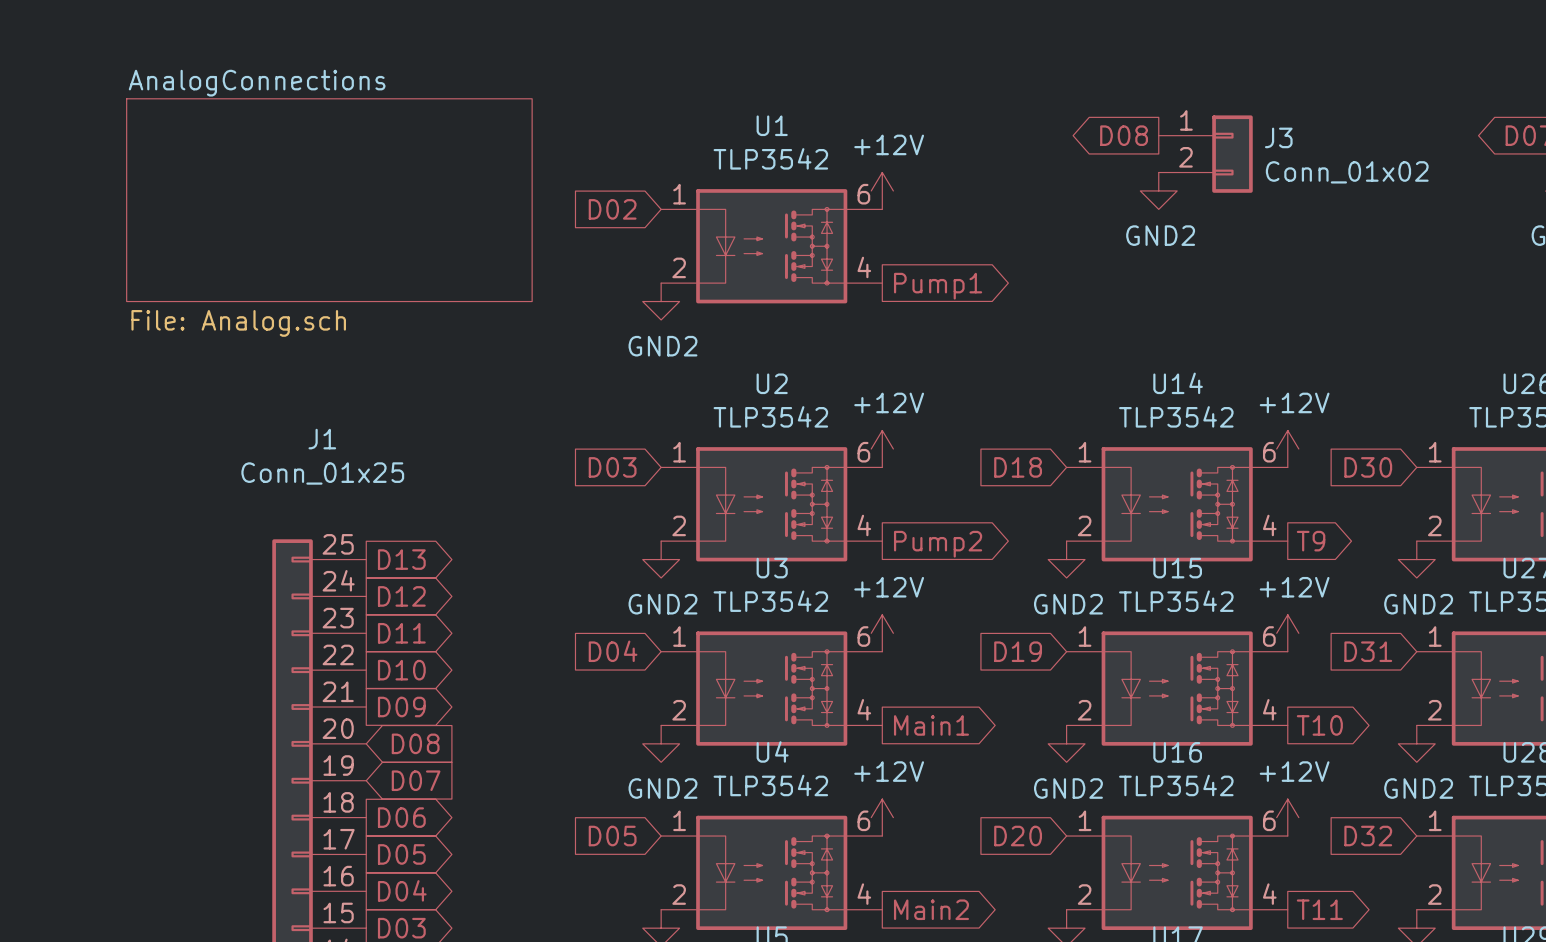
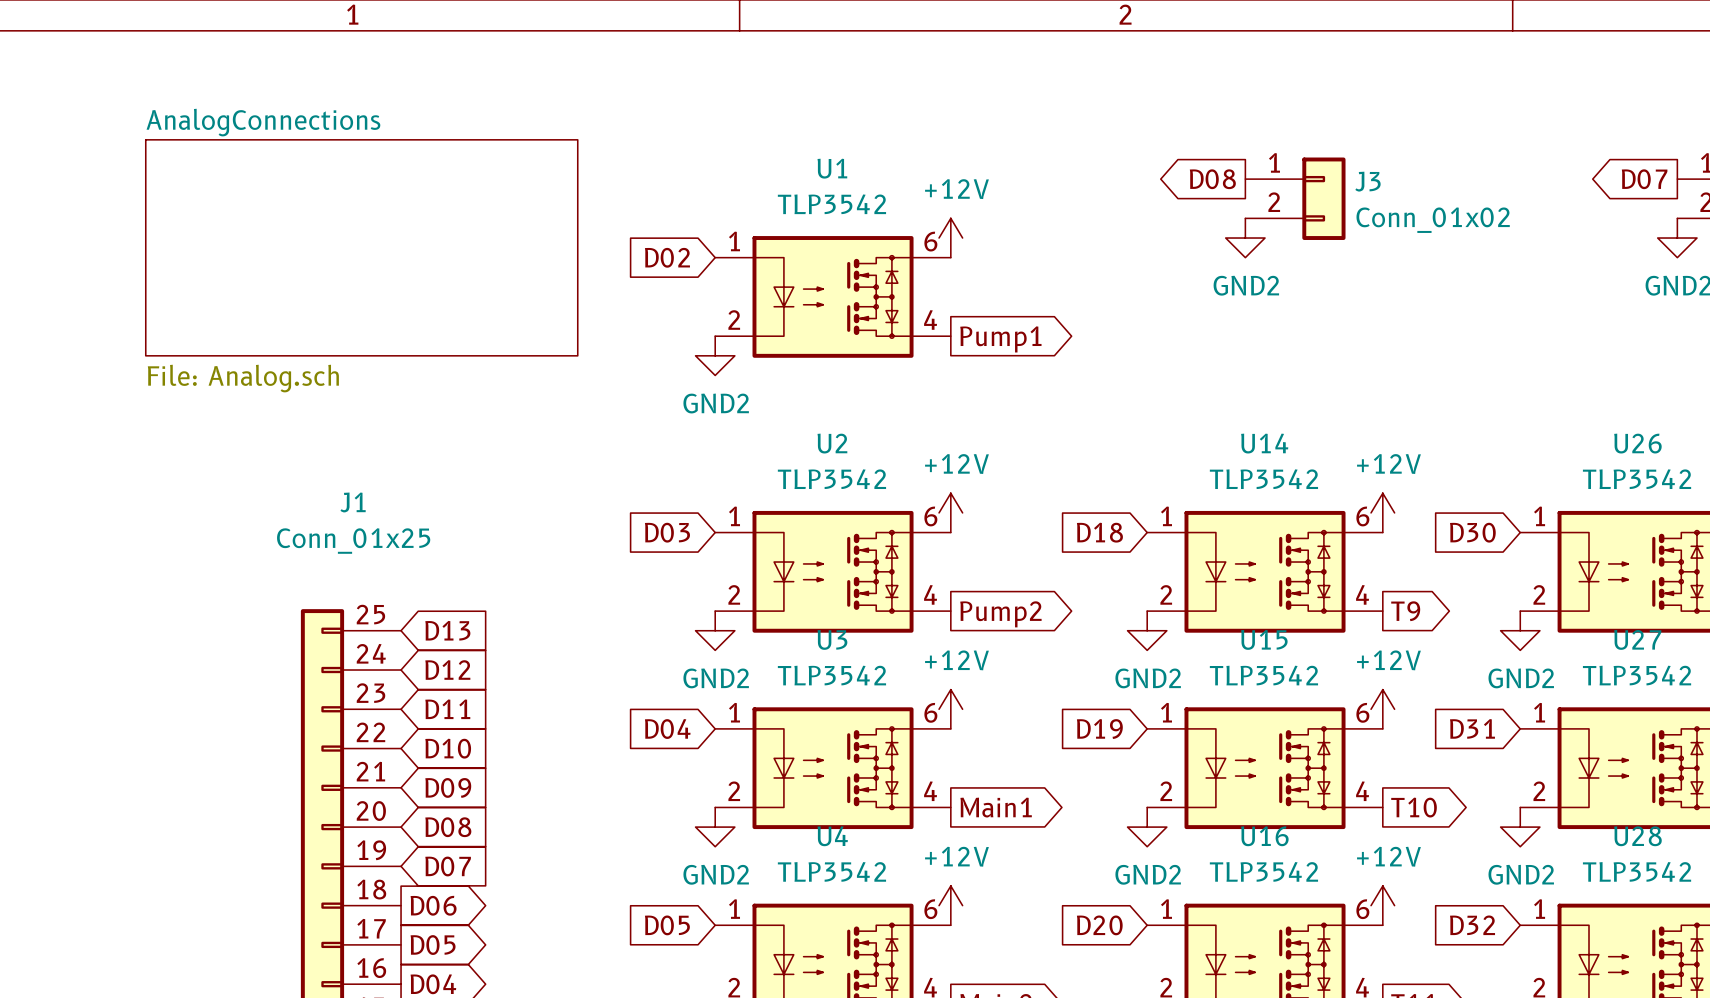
global label shape: output (401, 559) -> input (447, 630)
global label shape: output (401, 596) -> input (447, 670)
global label shape: output (401, 633) -> input (447, 709)
global label shape: output (401, 670) -> input (448, 748)
global label shape: output (401, 707) -> input (448, 787)

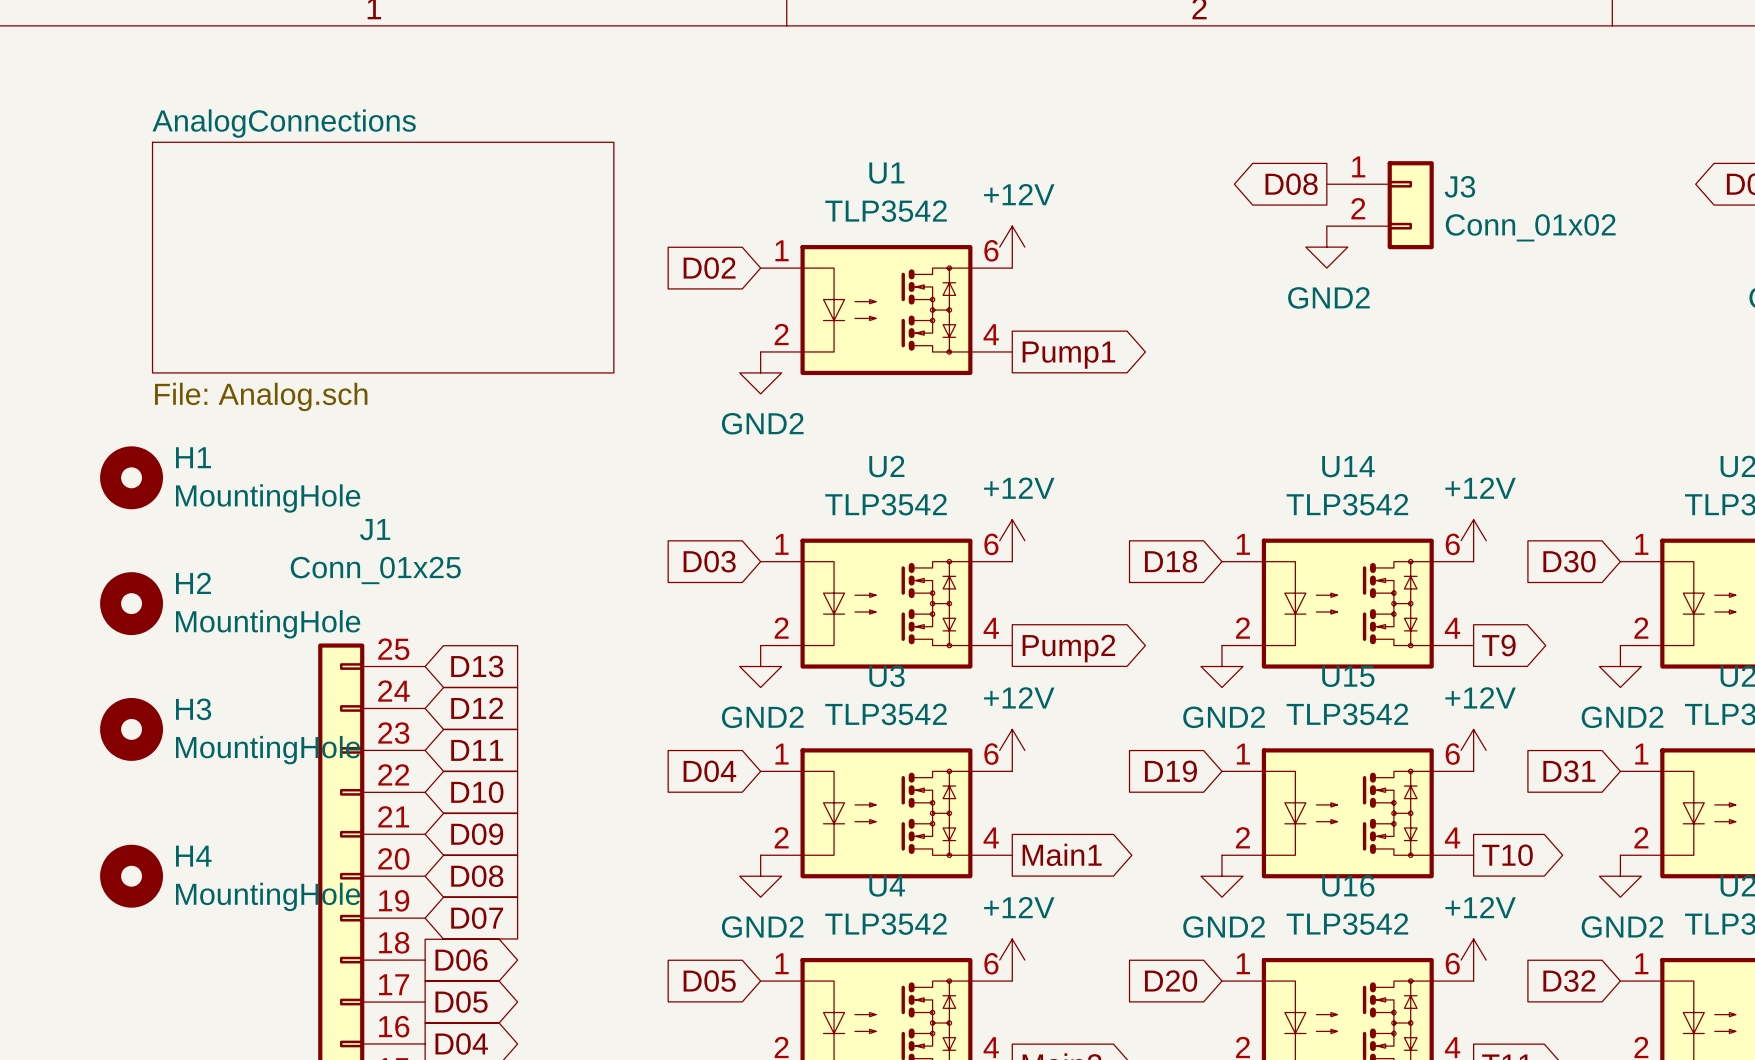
H1: none -> MountingHole (131, 477)
H2: none -> MountingHole (131, 603)
H3: none -> MountingHole (131, 729)
H4: none -> MountingHole (131, 876)

